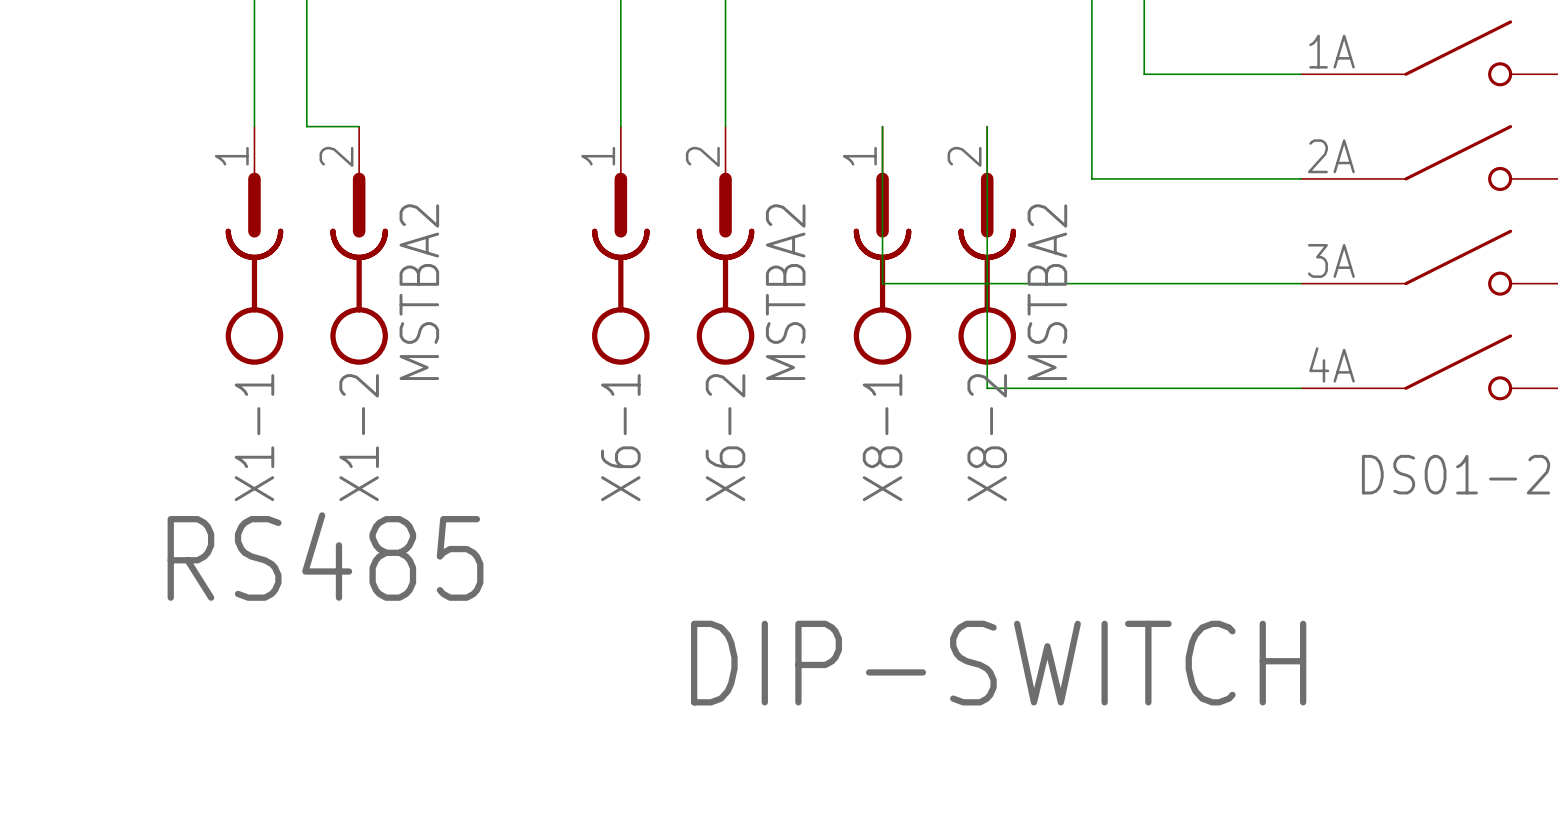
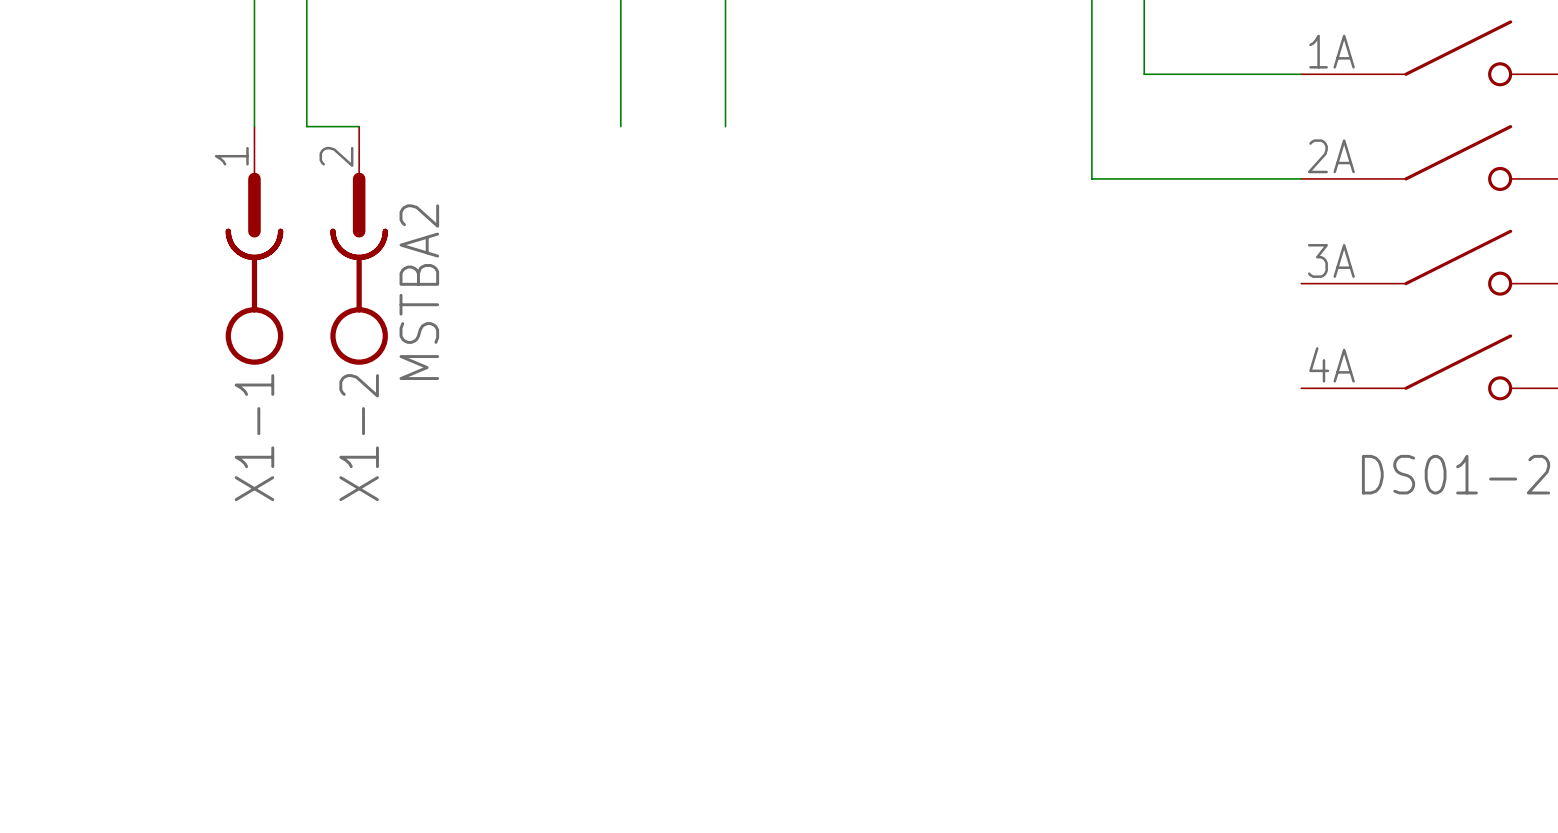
wire: (882, 126) (882, 283) (1301, 283) -> none
wire: (987, 126) (987, 388) (1301, 388) -> none
X6-1: (620, 245) -> none
X6-2: MSTBA2 (725, 245) -> none
X8-1: (882, 245) -> none
X8-2: MSTBA2 (987, 245) -> none
text: RS485 (325, 556) -> none
text: DIP-SWITCH (998, 663) -> none

